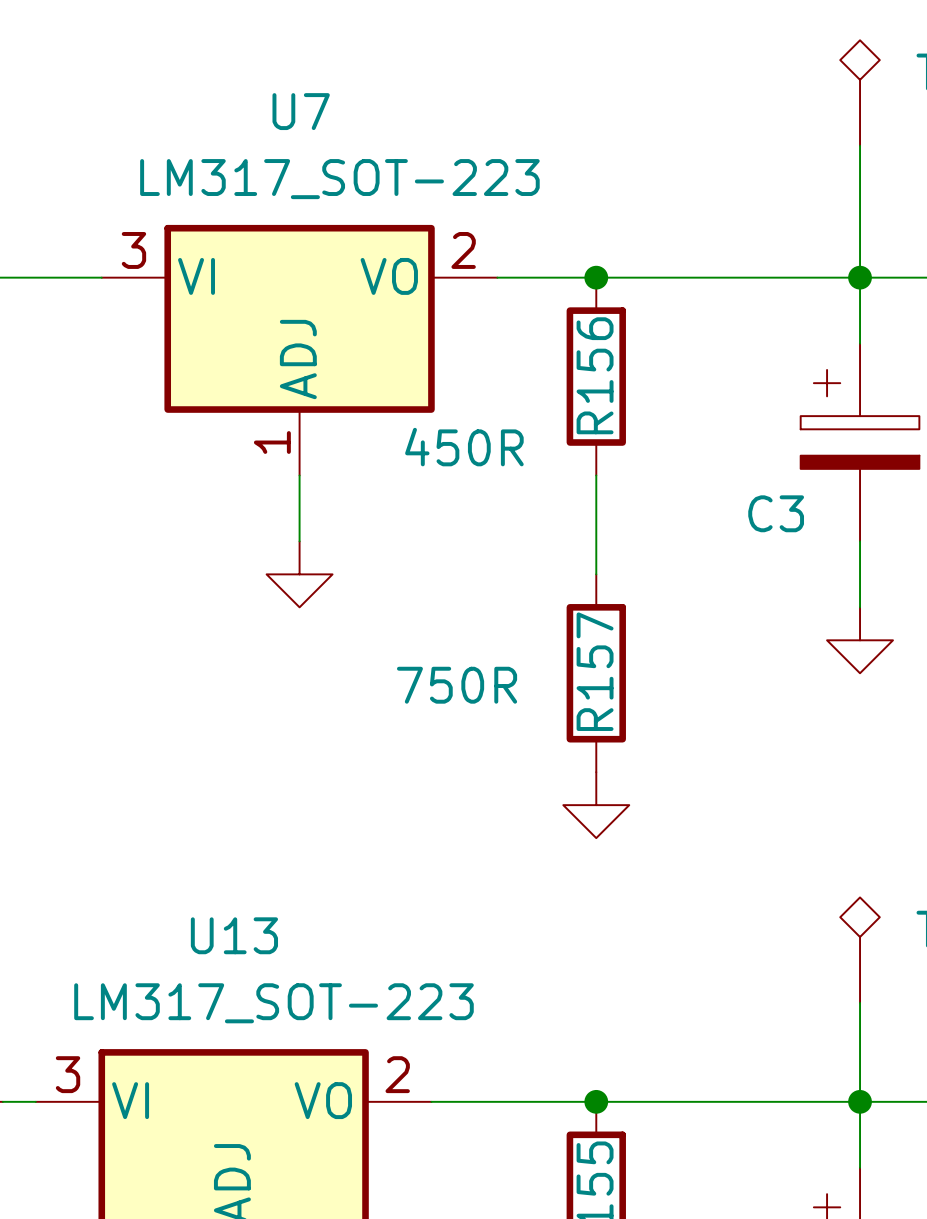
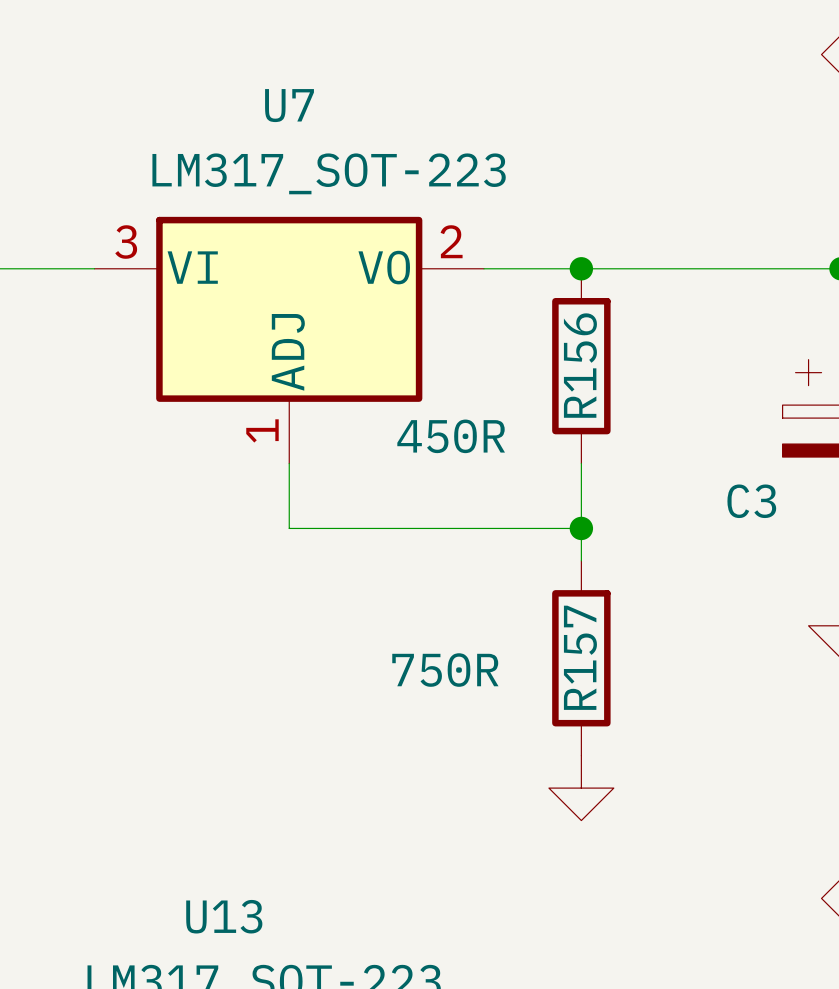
wire: none -> (289, 528) (581, 528)
junction: none -> (581, 528)
power symbol: (299, 574) -> none

